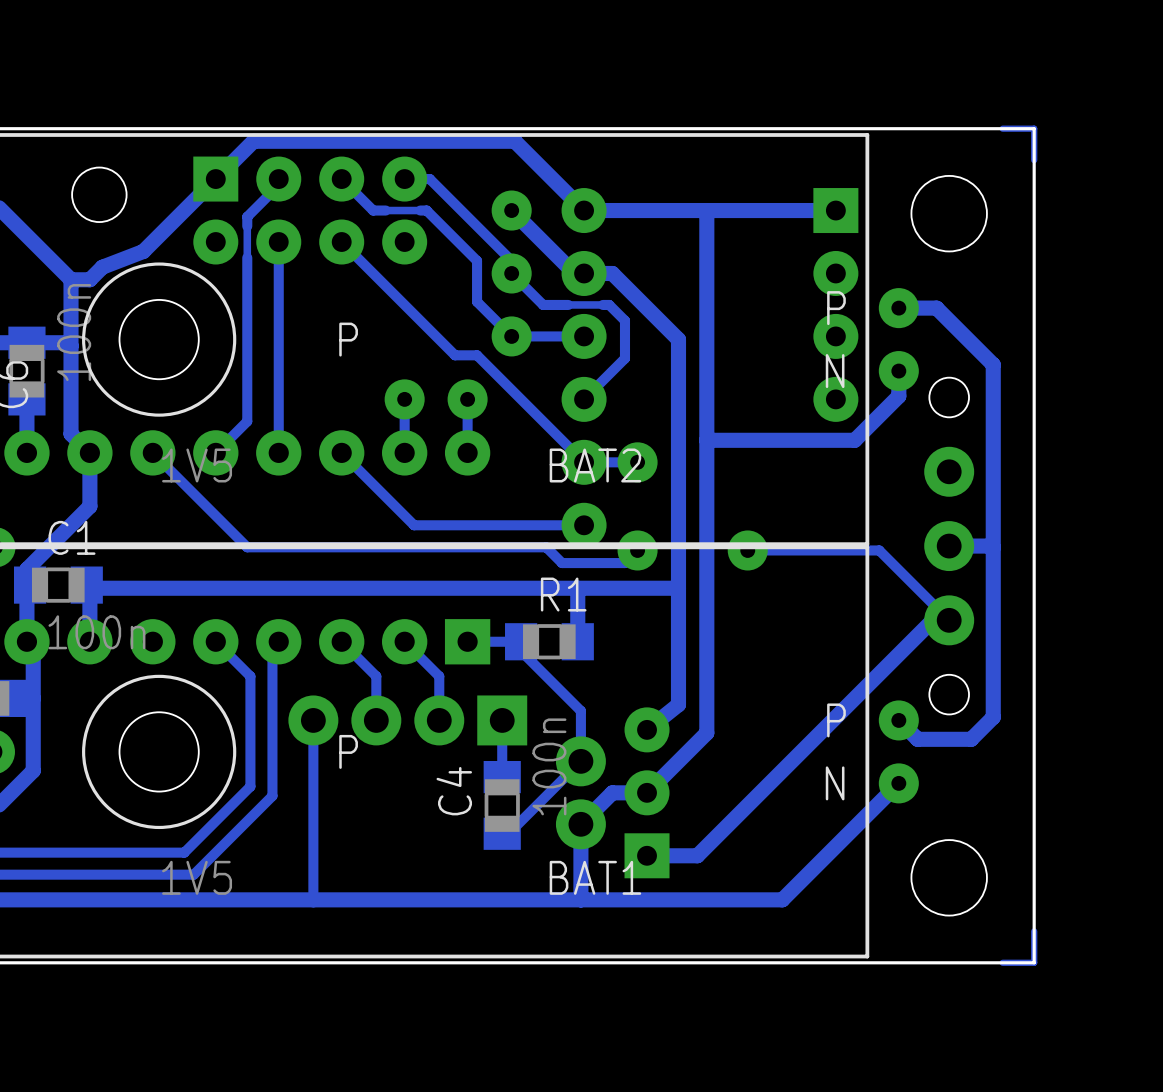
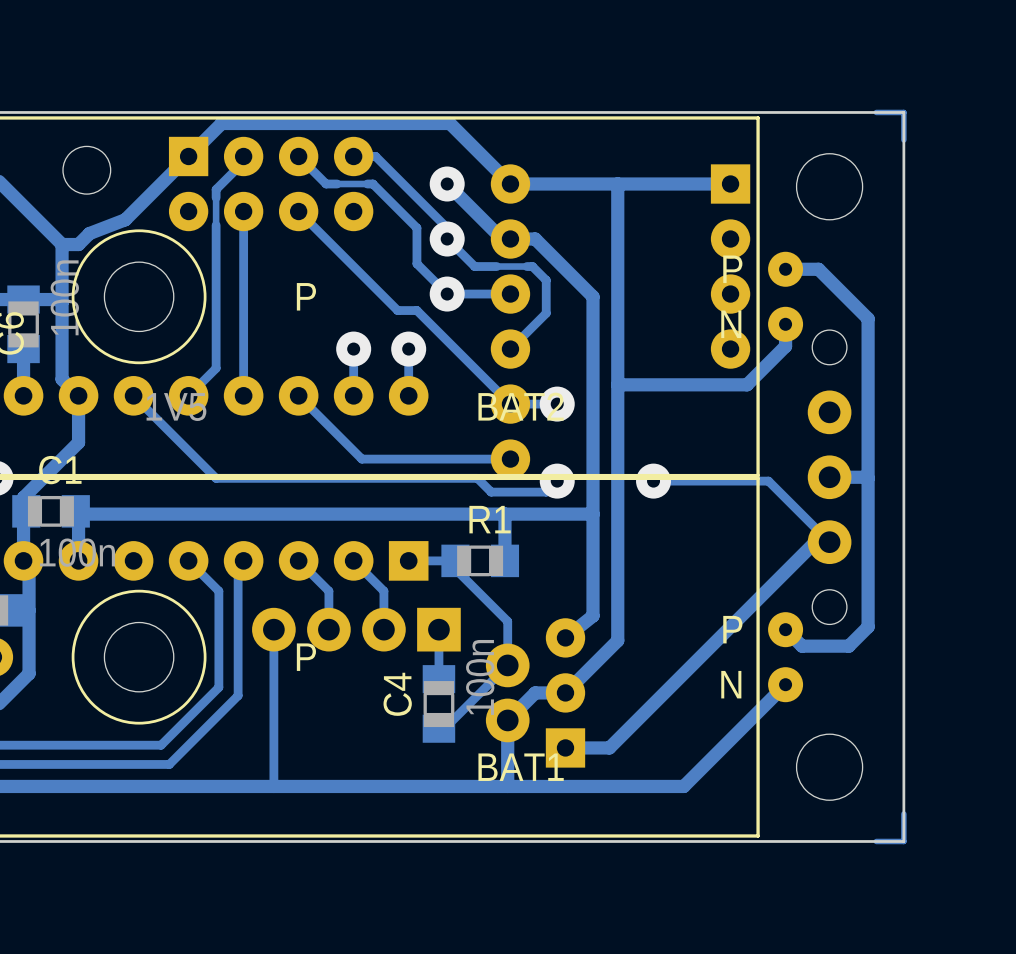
BAT1 value: 1V5 (197, 877) -> none

